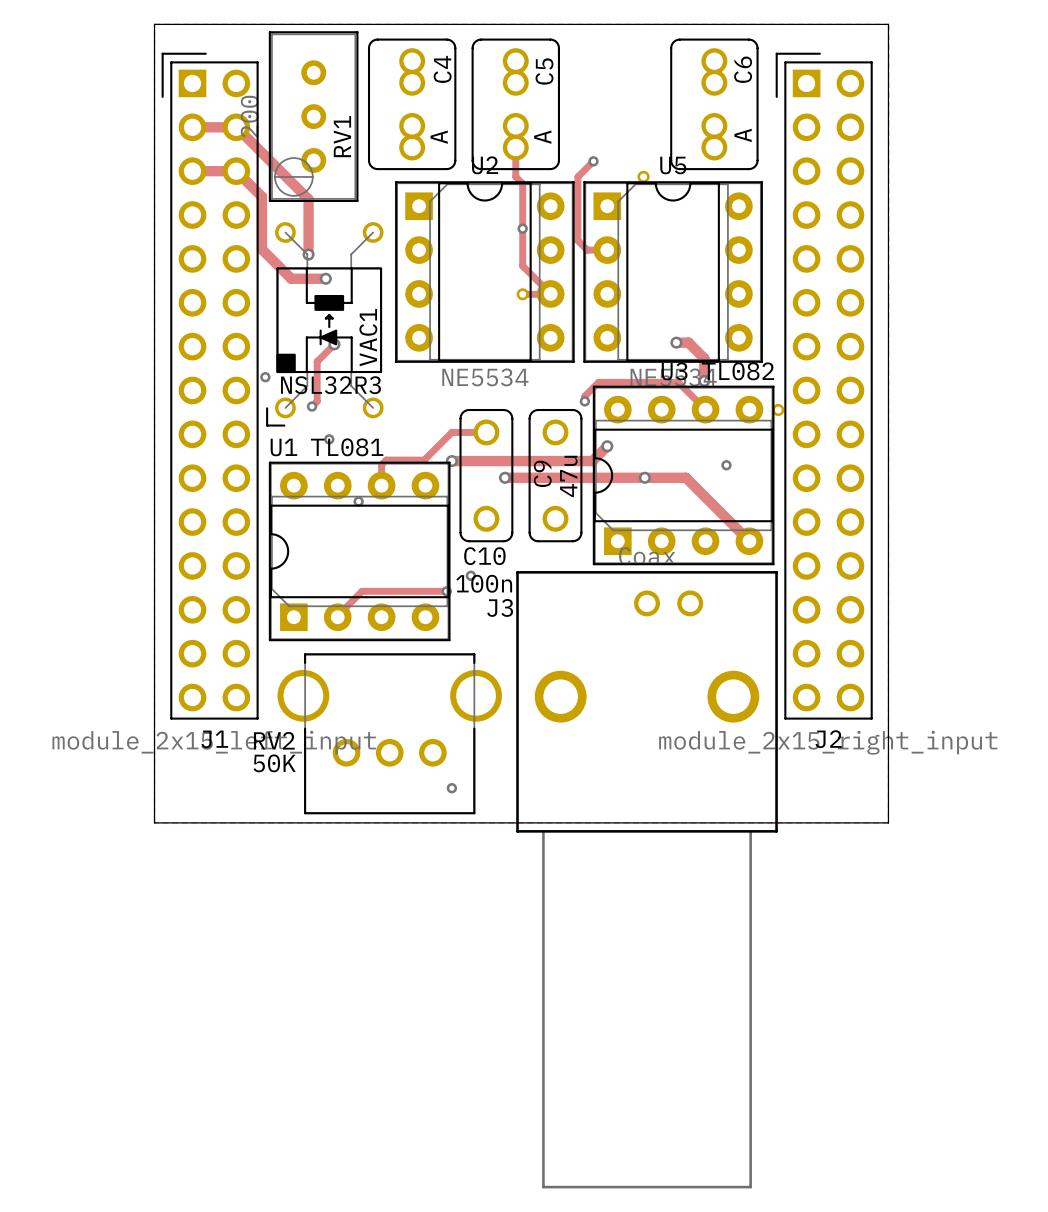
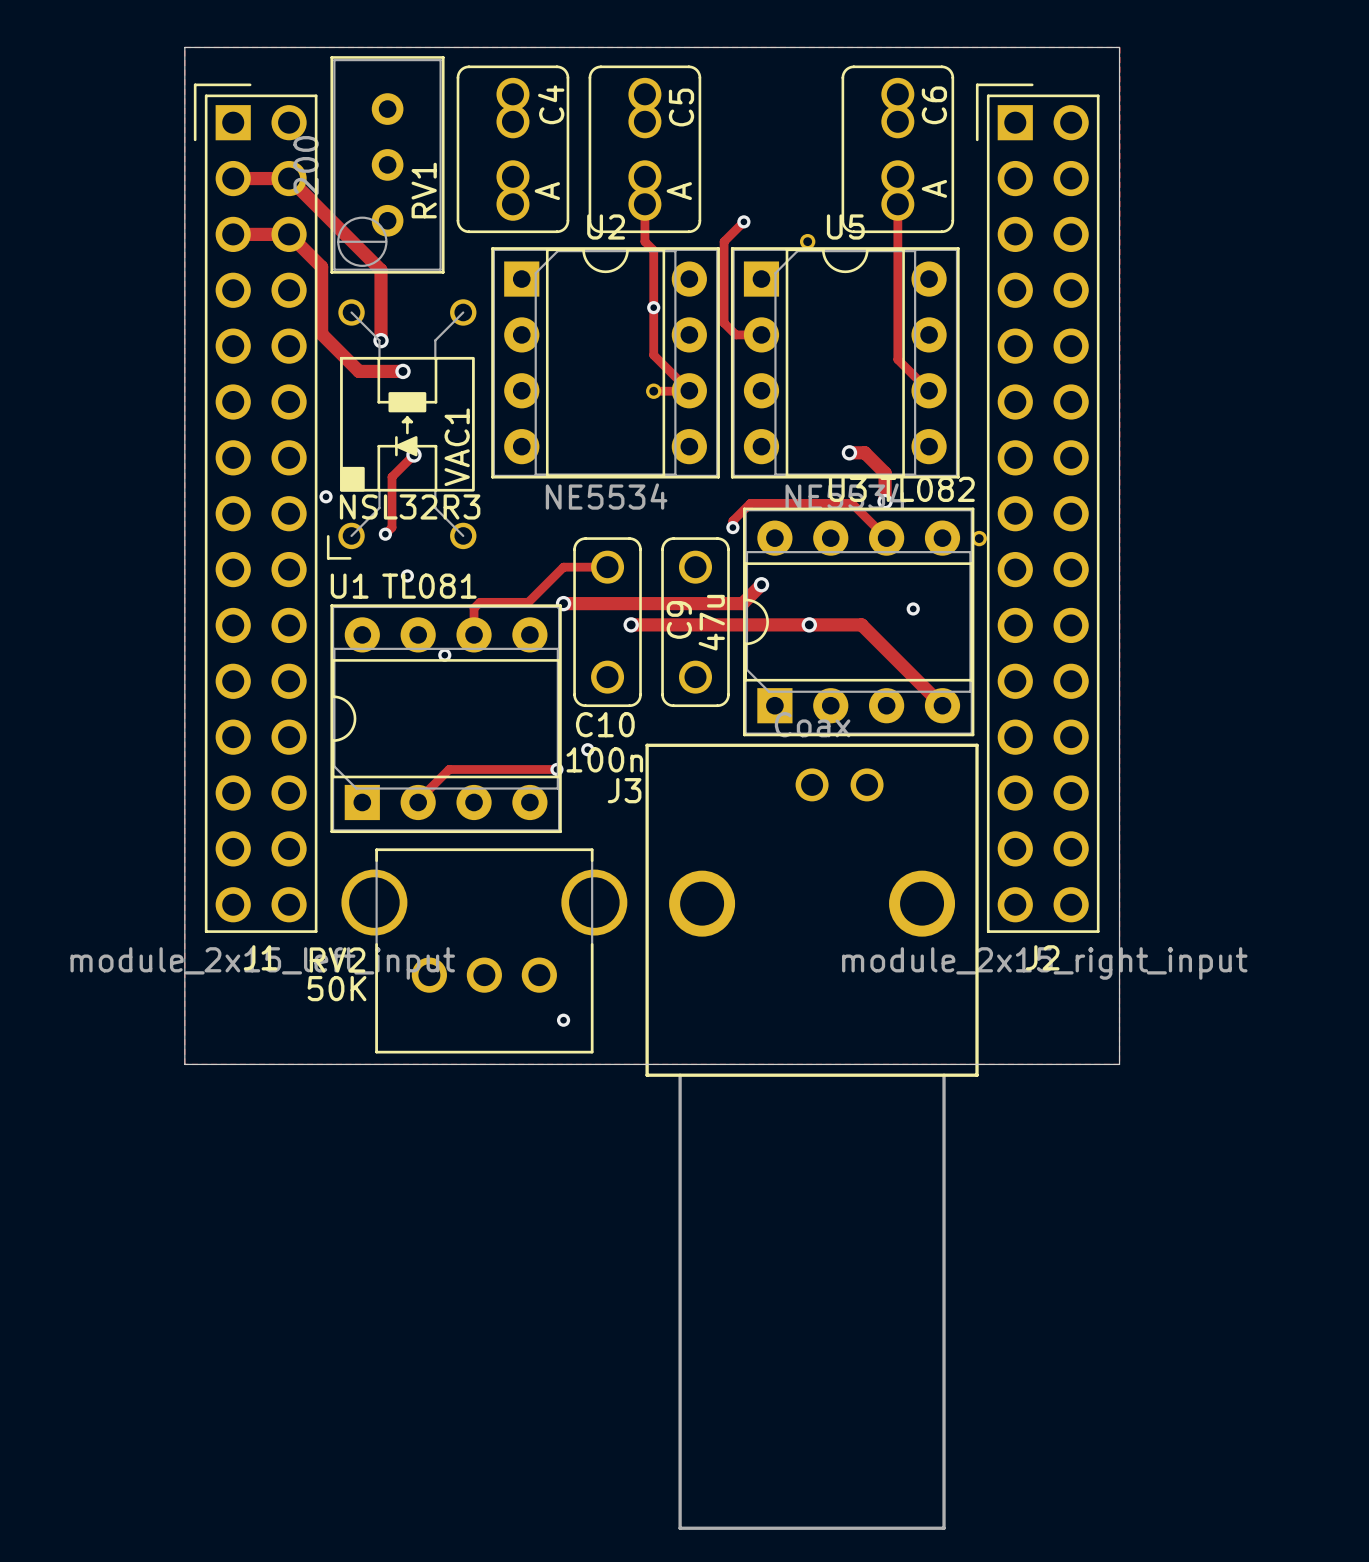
track: none -> (897, 204) (897, 359) (929, 390)

